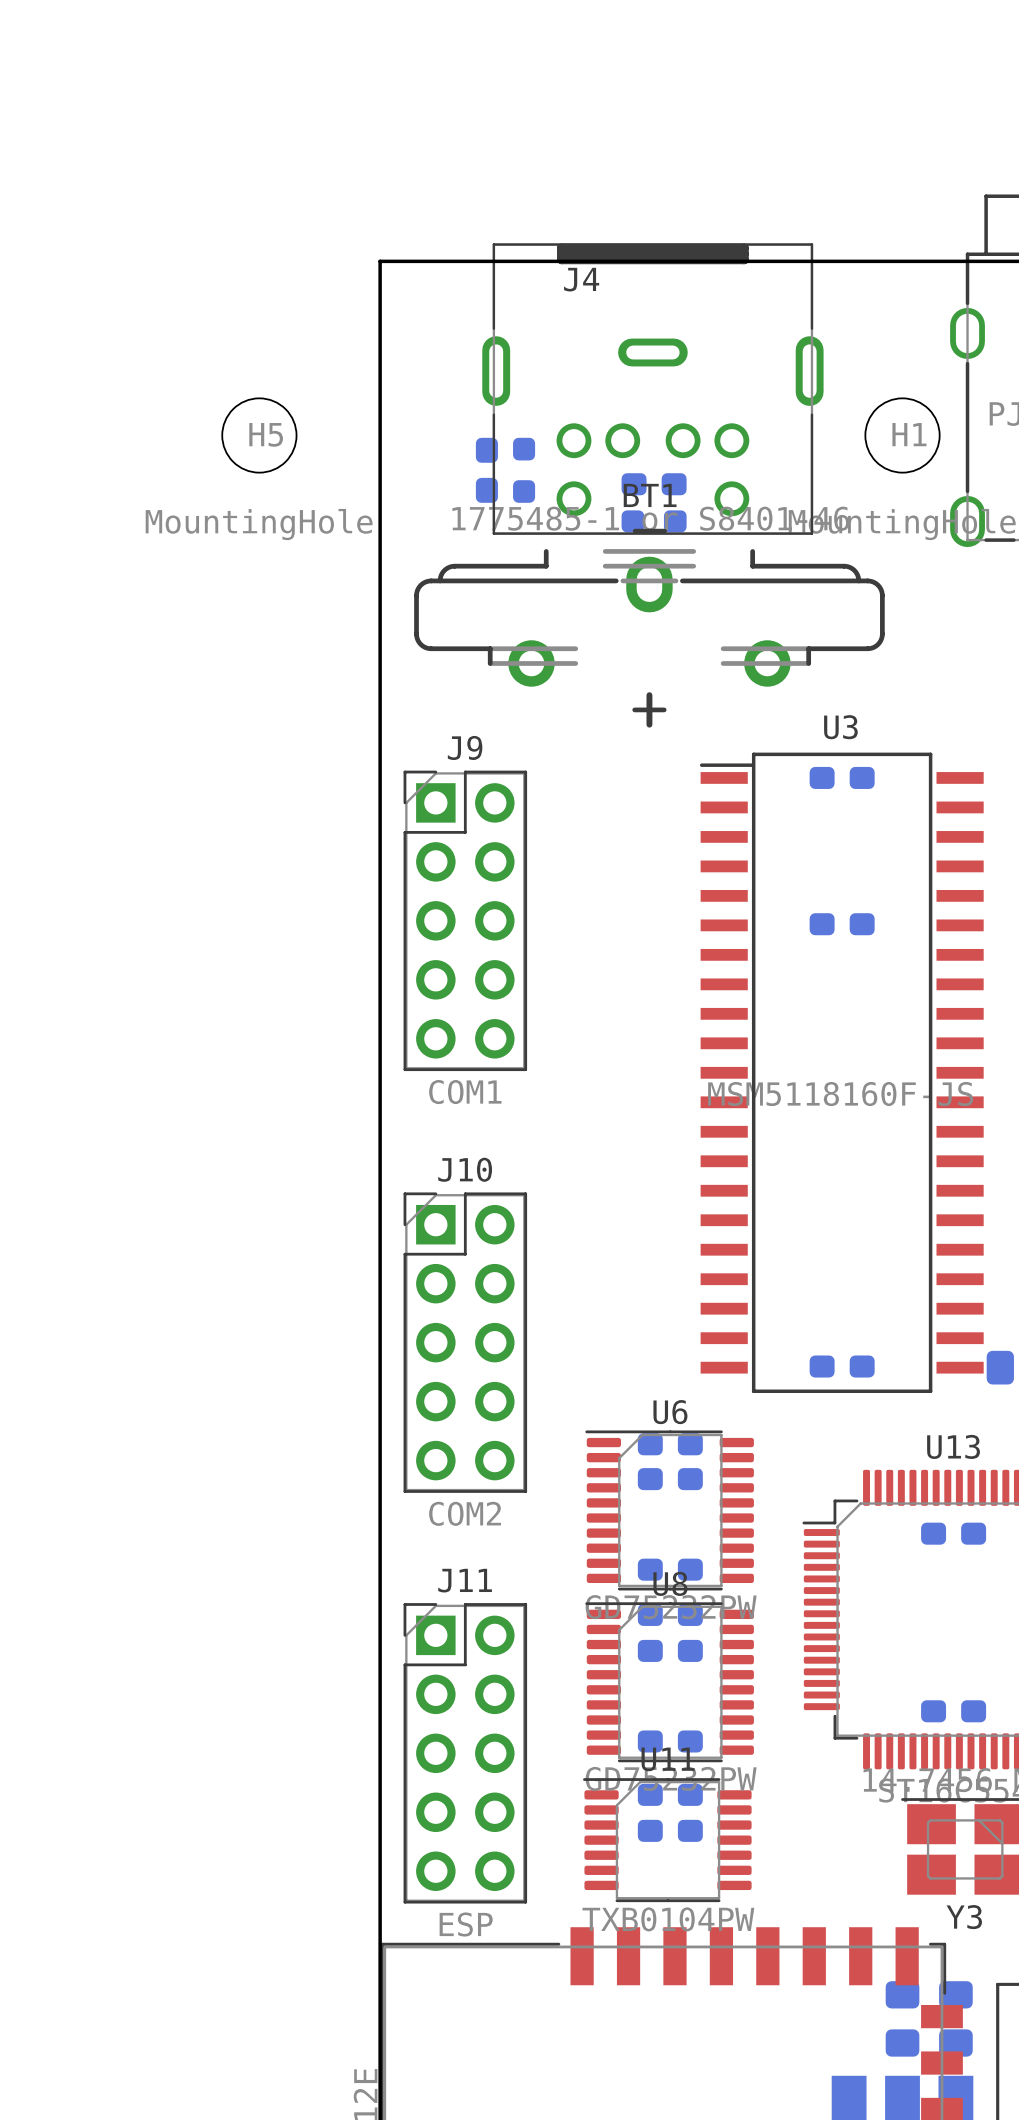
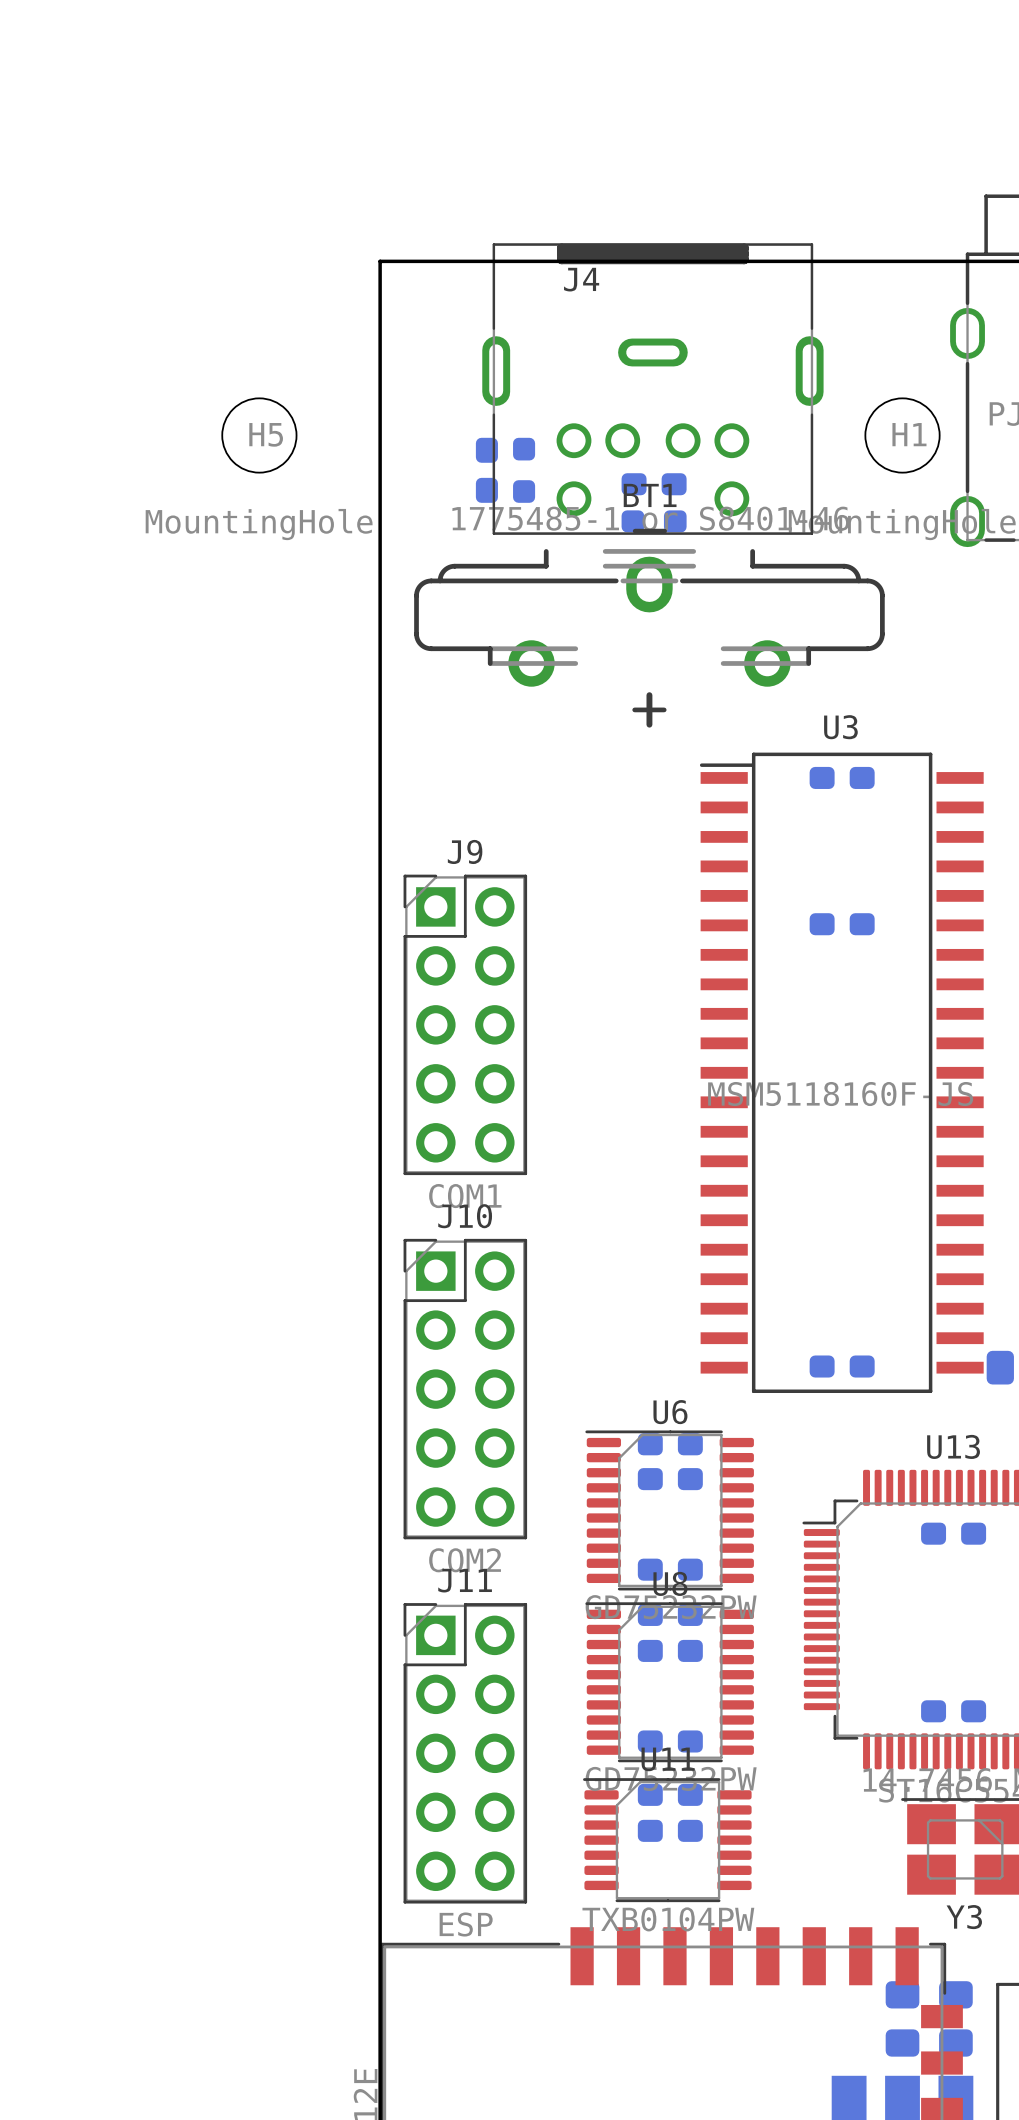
J9 position: (465, 920) -> (465, 1024)
J10 position: (465, 1342) -> (465, 1389)

